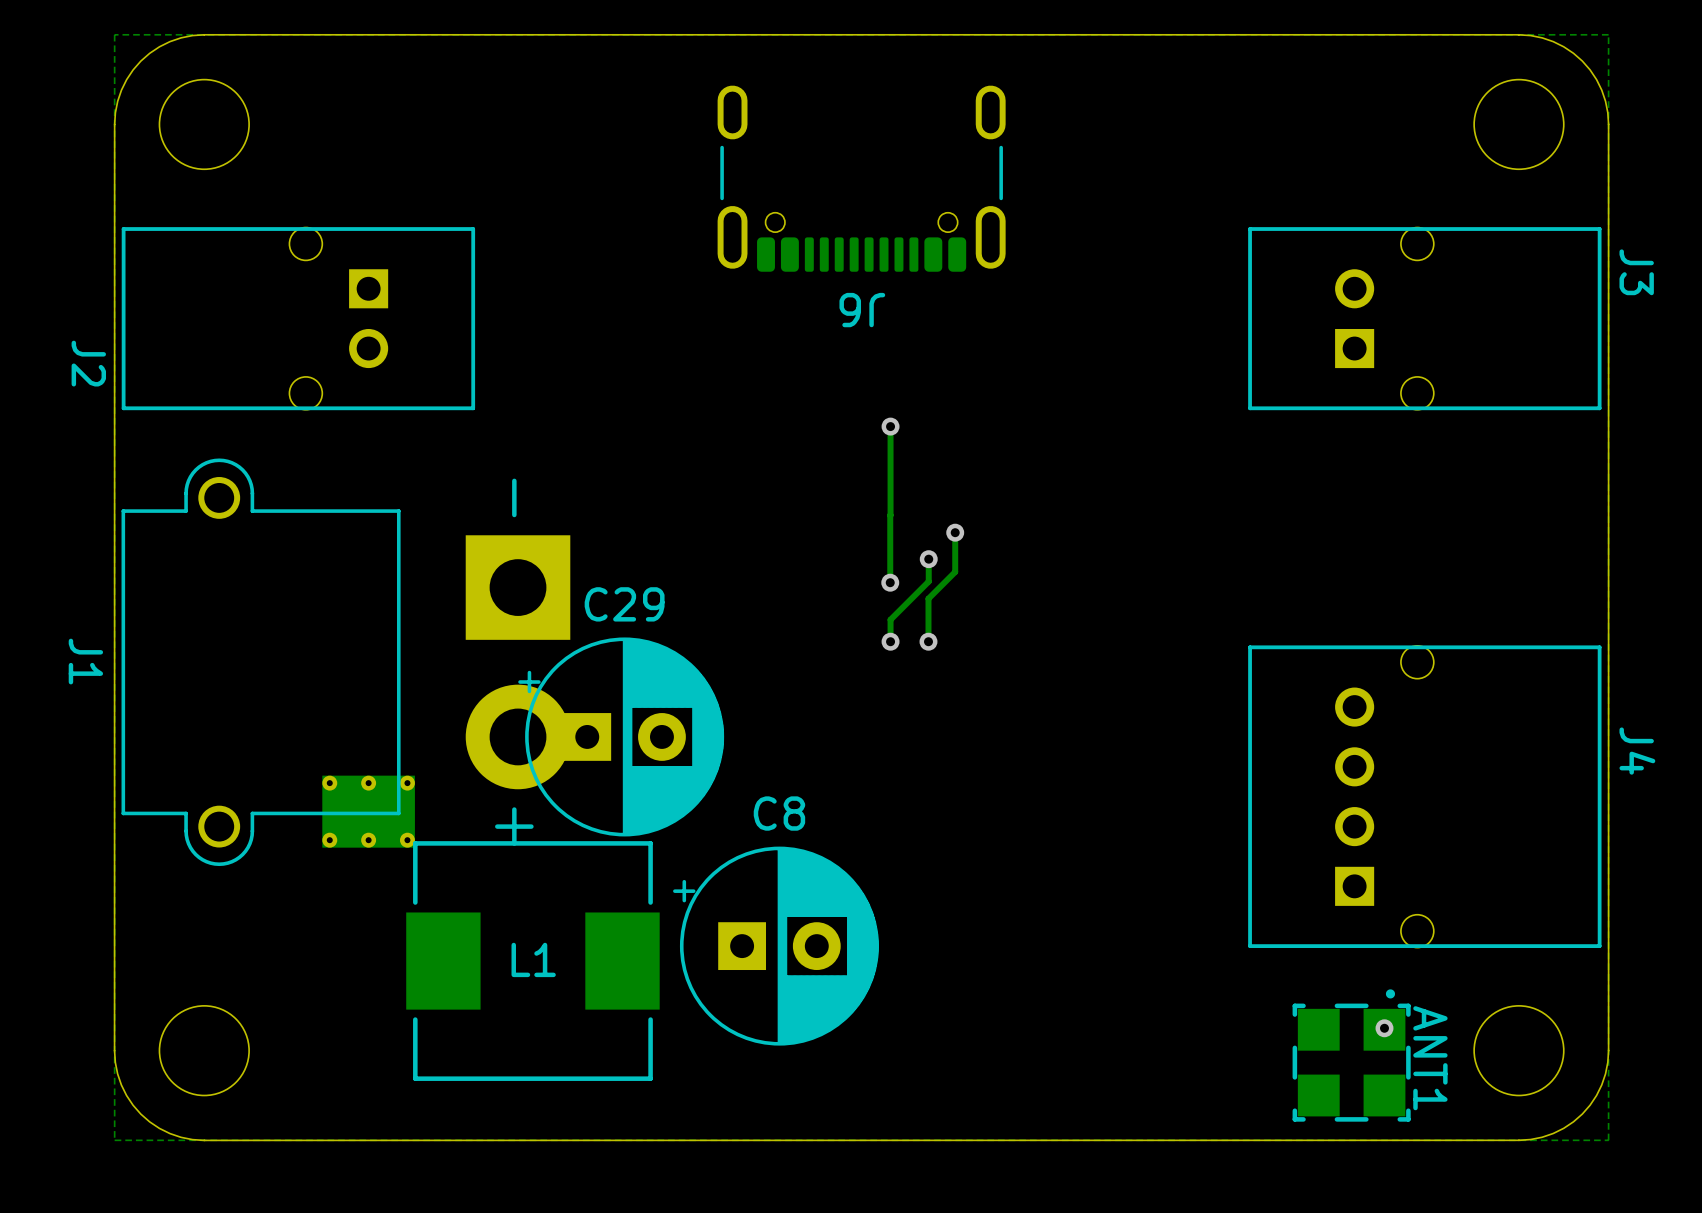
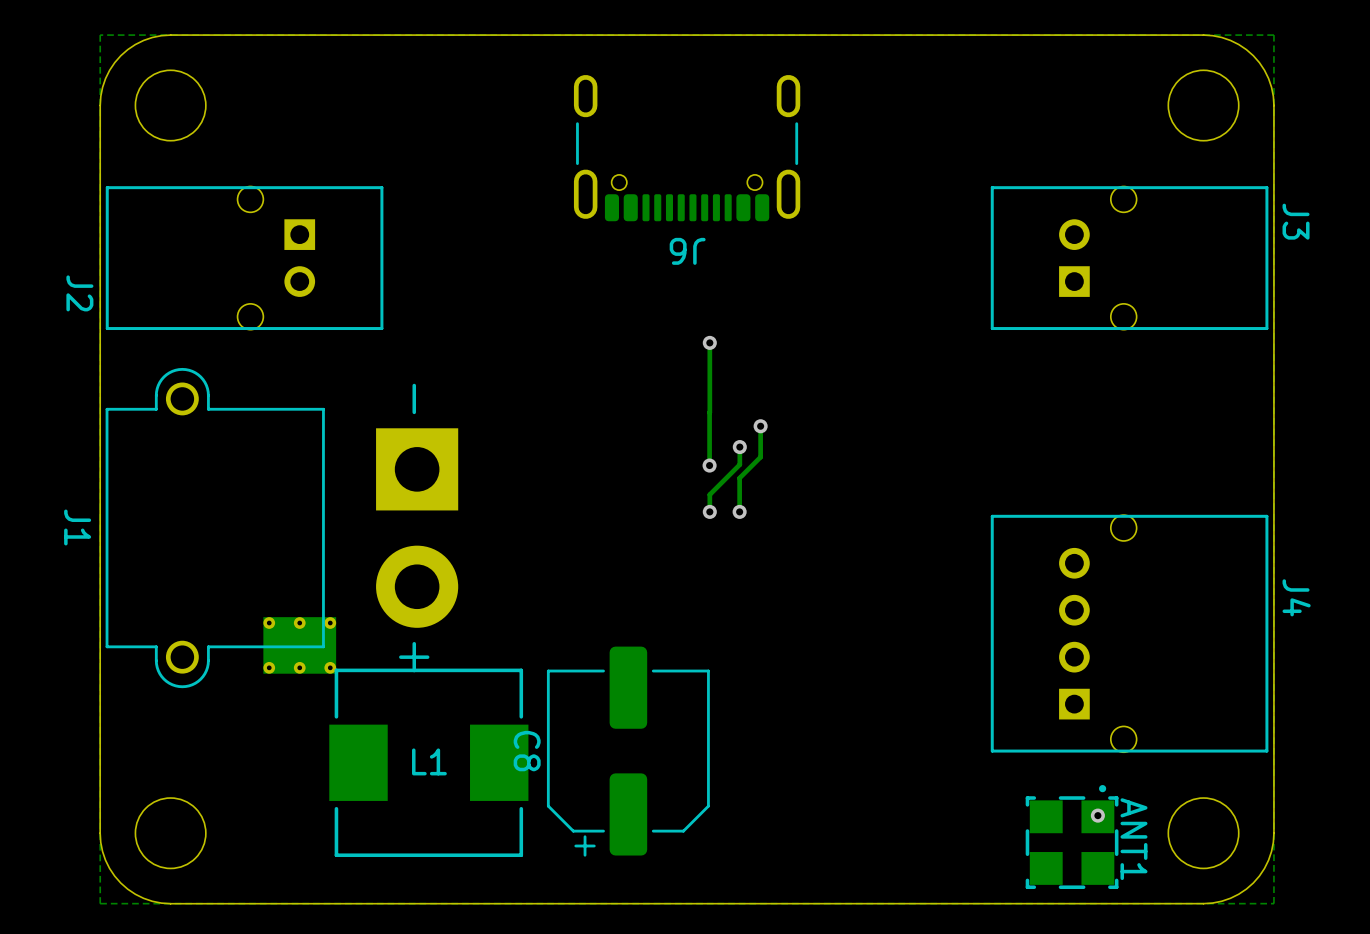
C29: (621, 736) -> none
C8 name position: C8 (779, 813) -> C8 (527, 751)
C8 footprint: [673, 846, 879, 1046] -> [546, 646, 710, 857]

